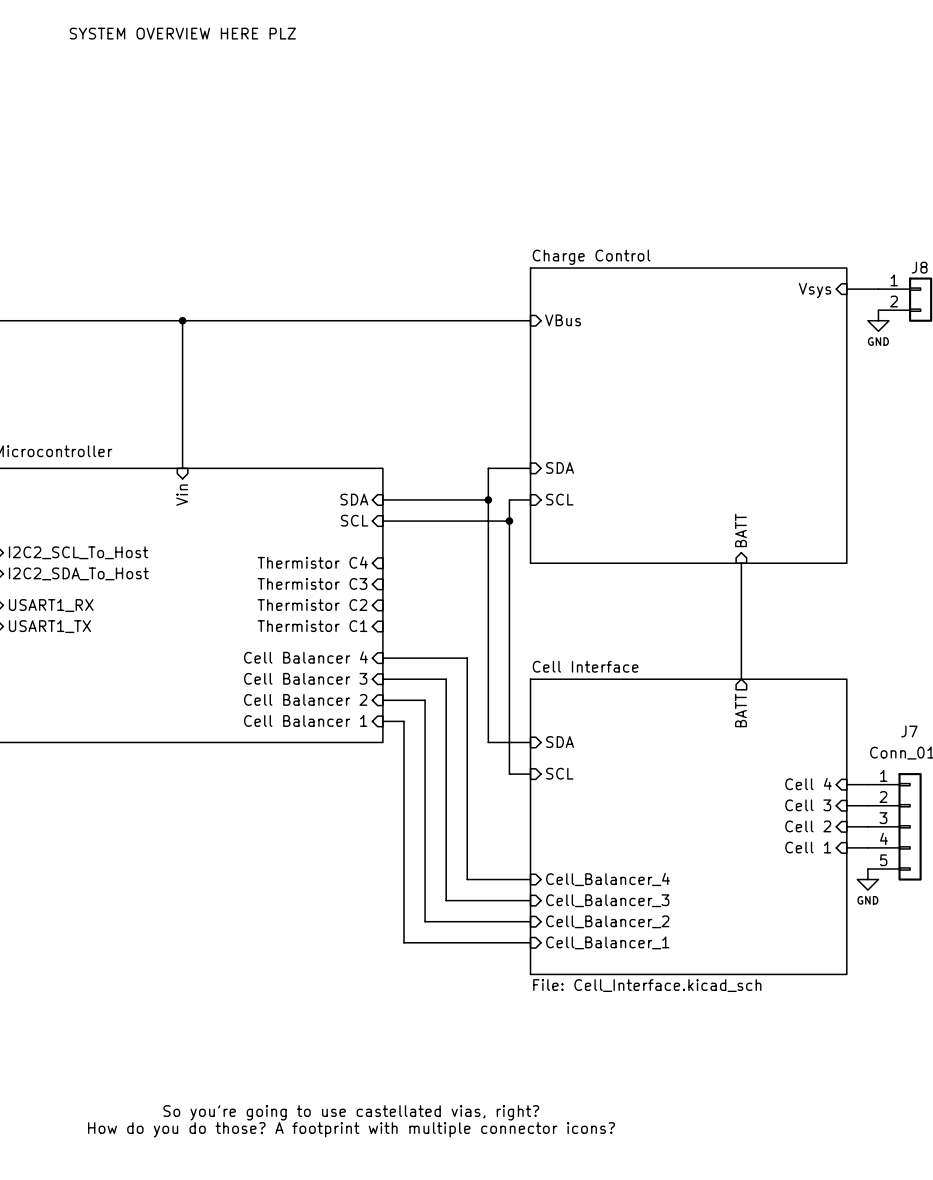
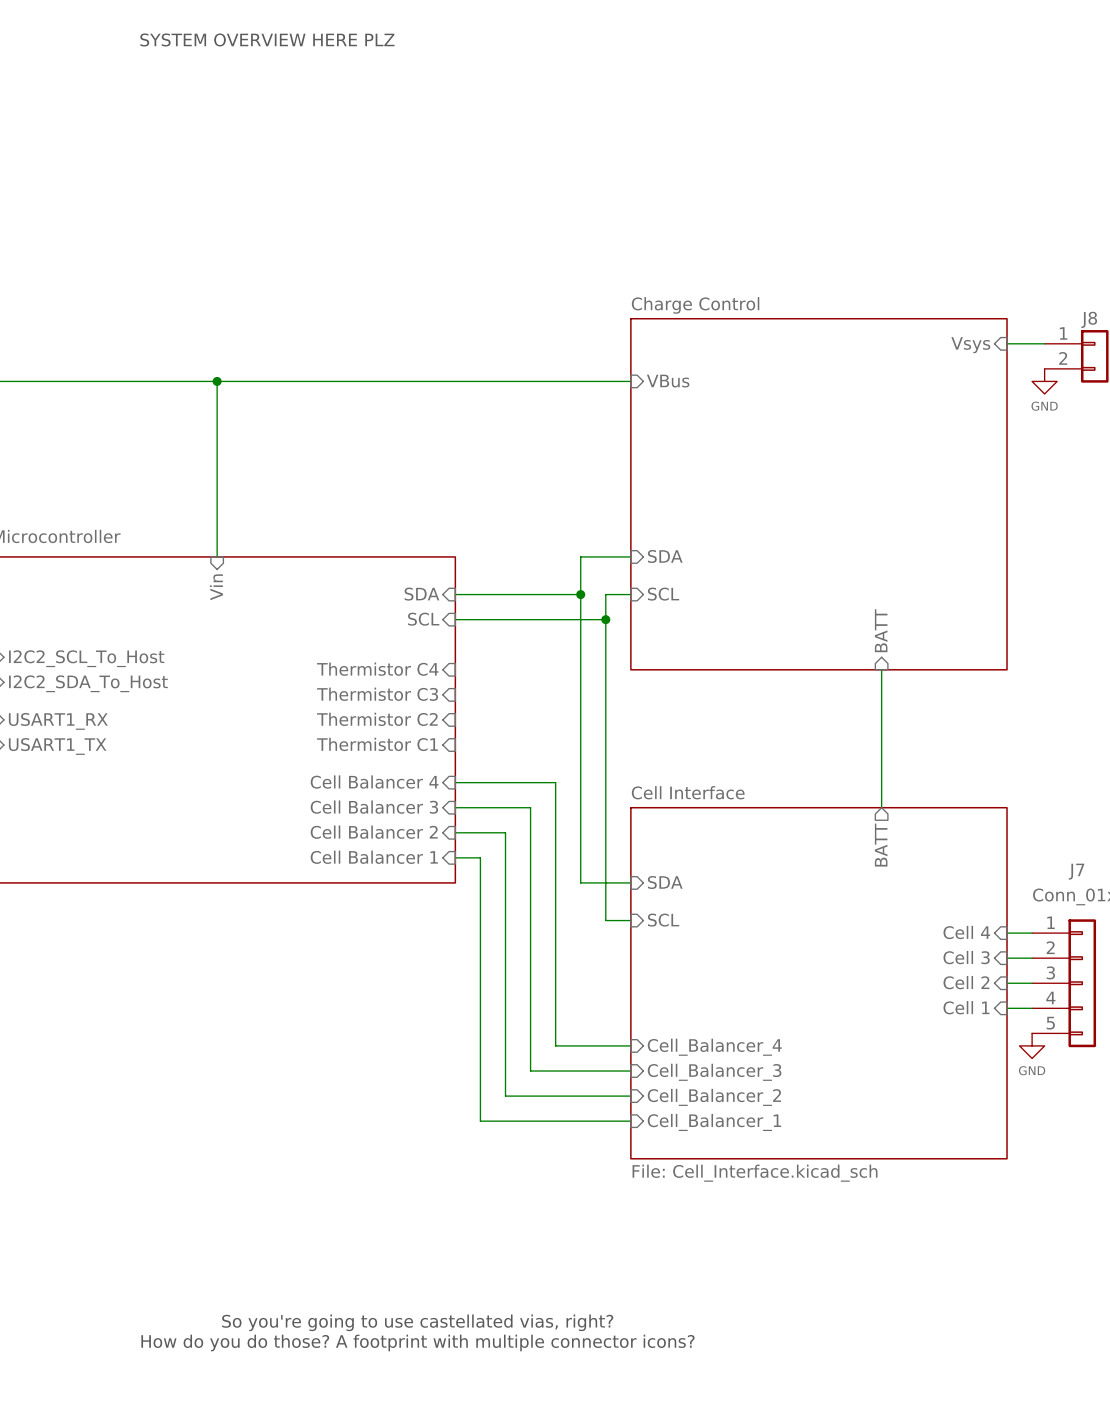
text position: SYSTEM OVERVIEW HERE PLZ (182, 33) -> SYSTEM OVERVIEW HERE PLZ (267, 39)

